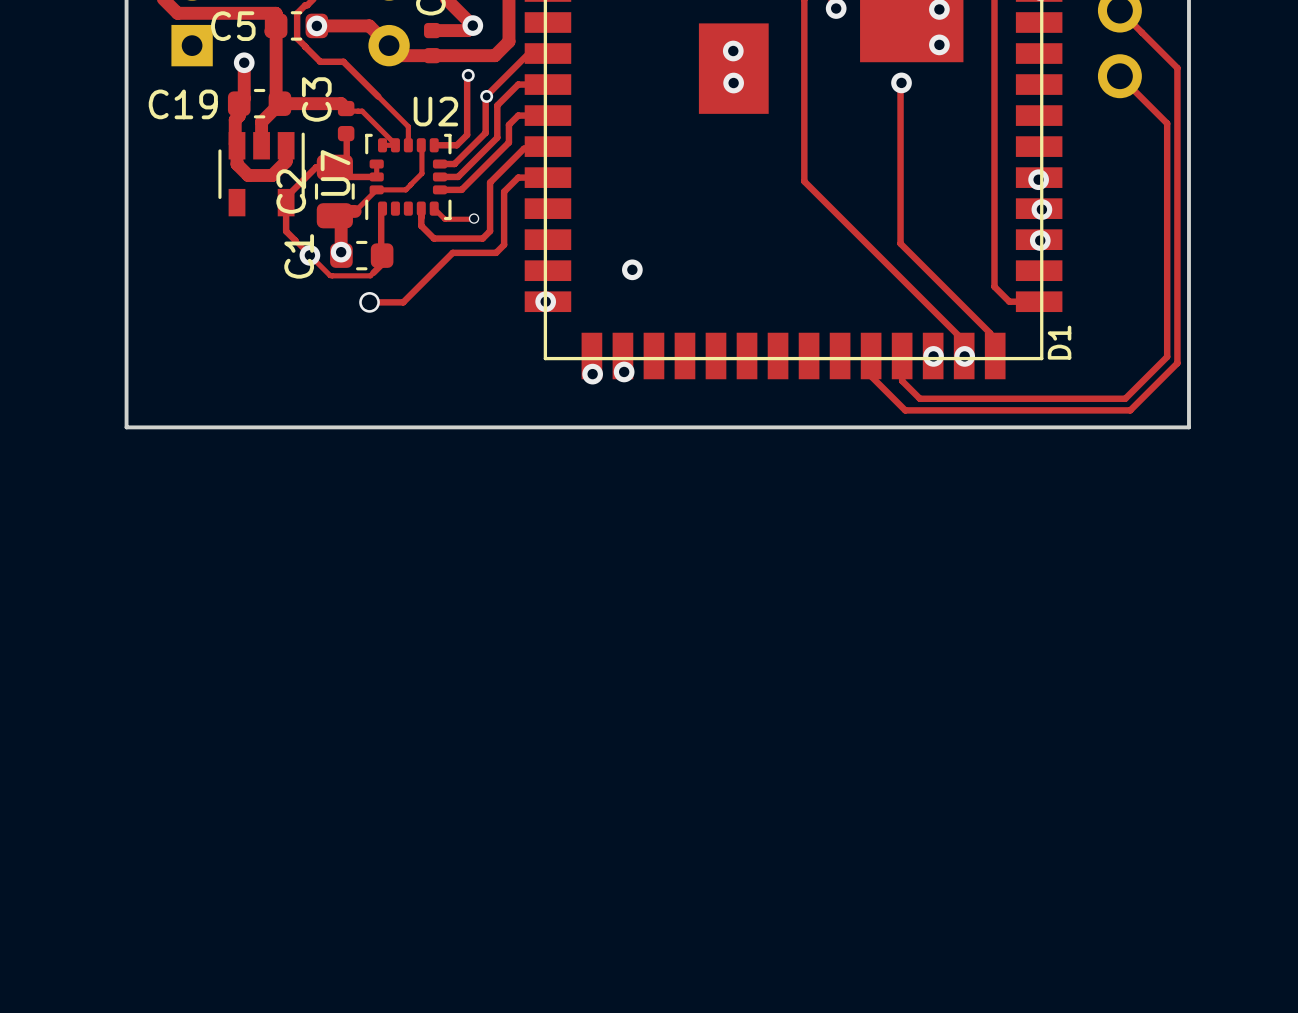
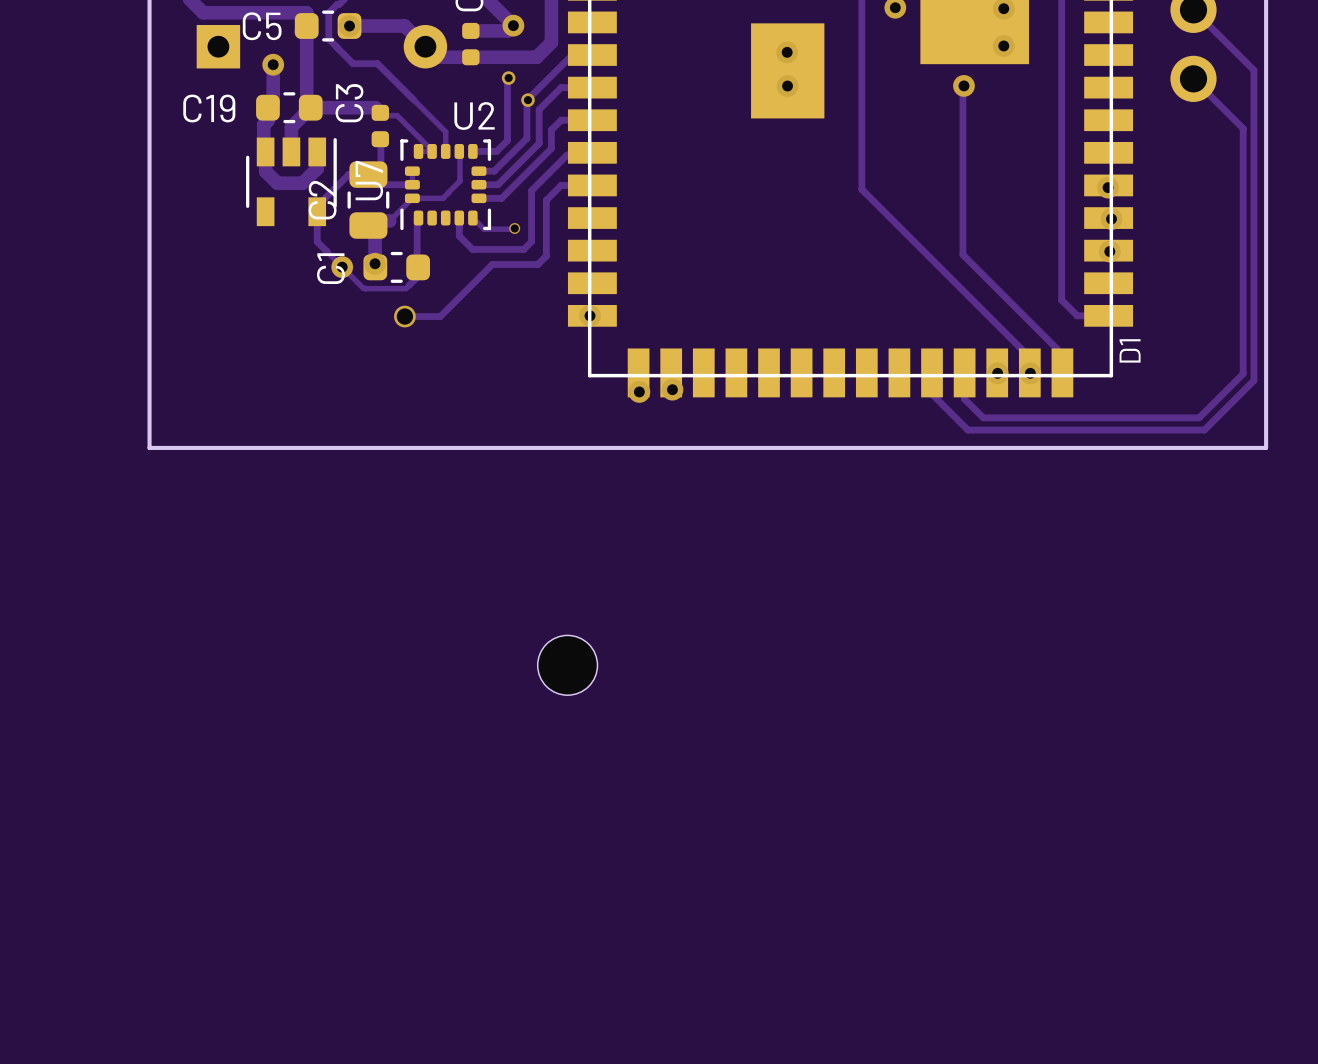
via: (632, 269) -> none
part: none -> (567, 665)

